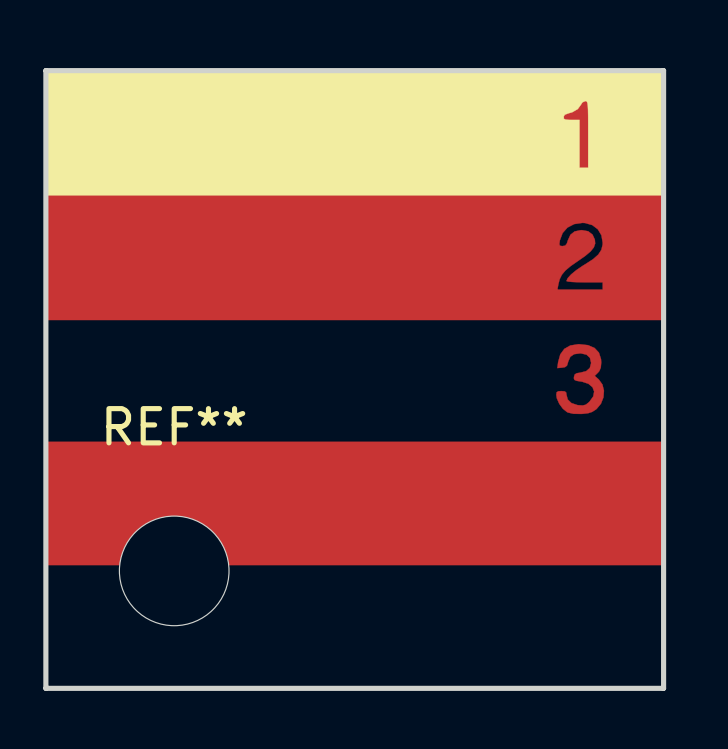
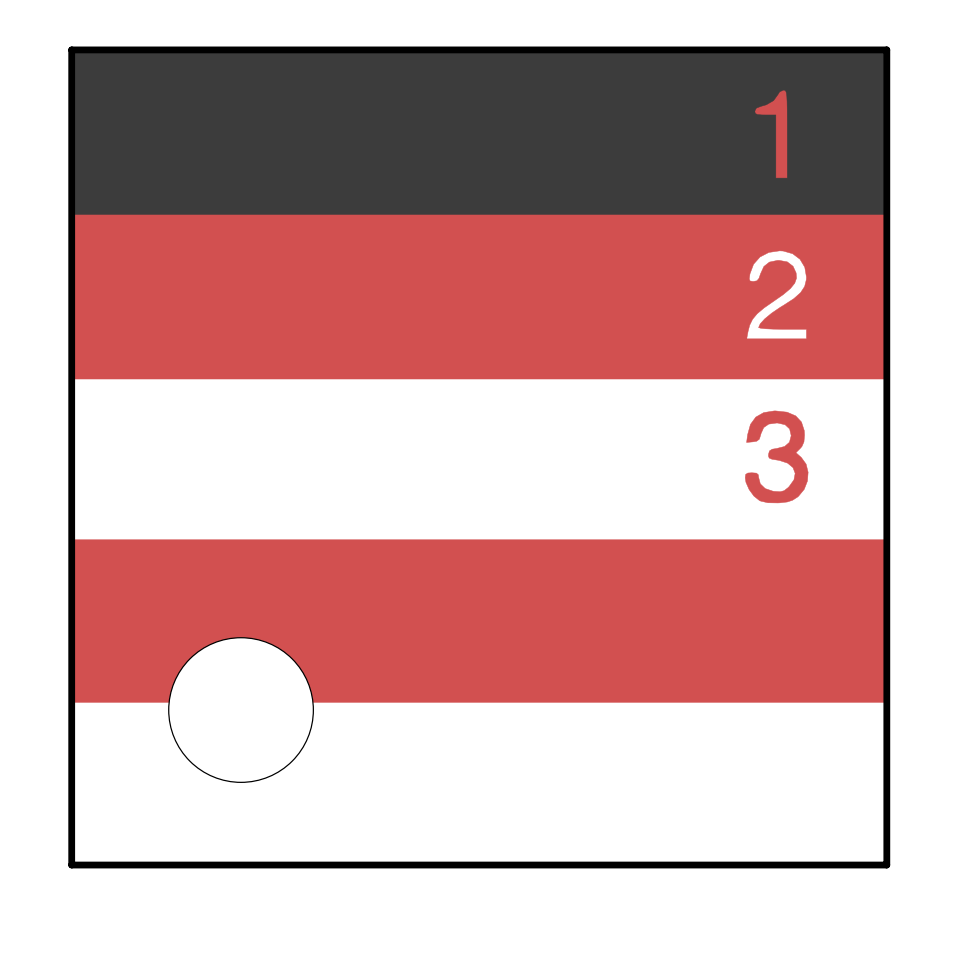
REF** name: REF** (175, 425) -> none

